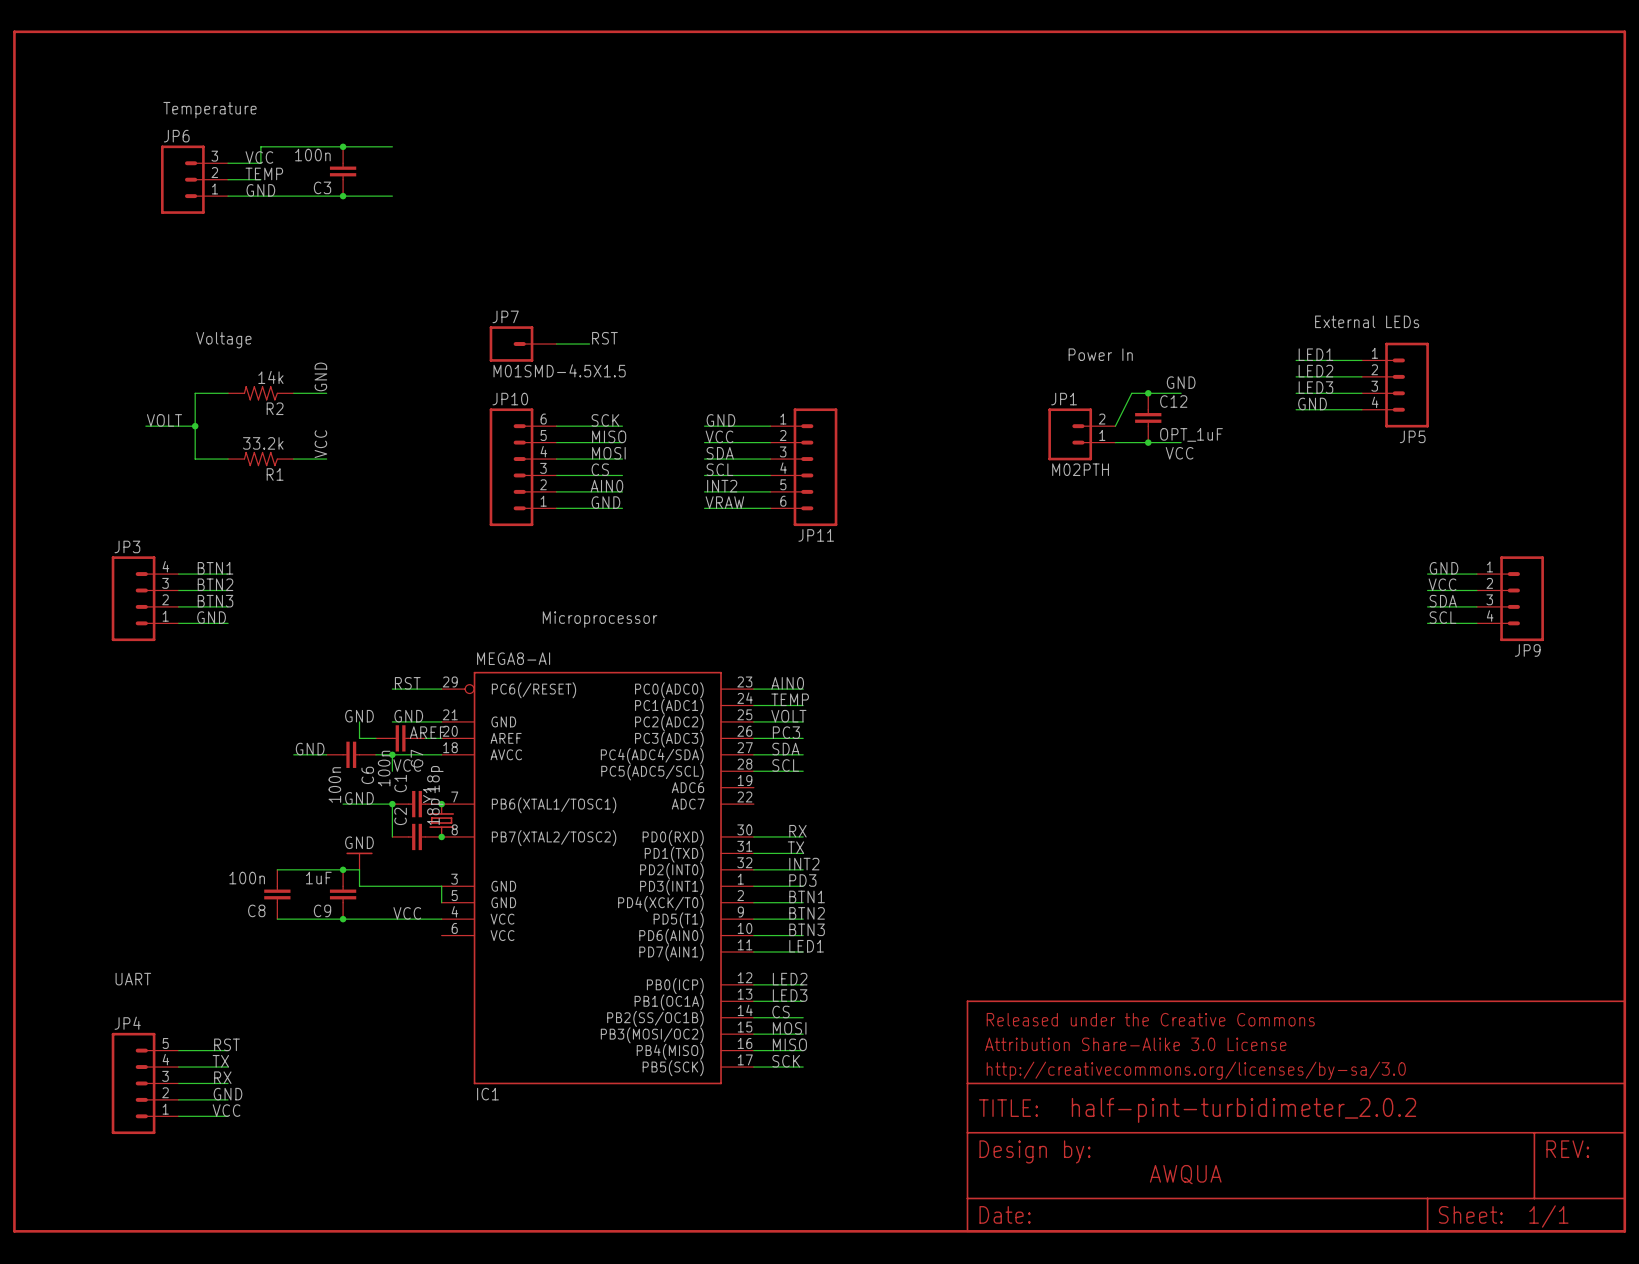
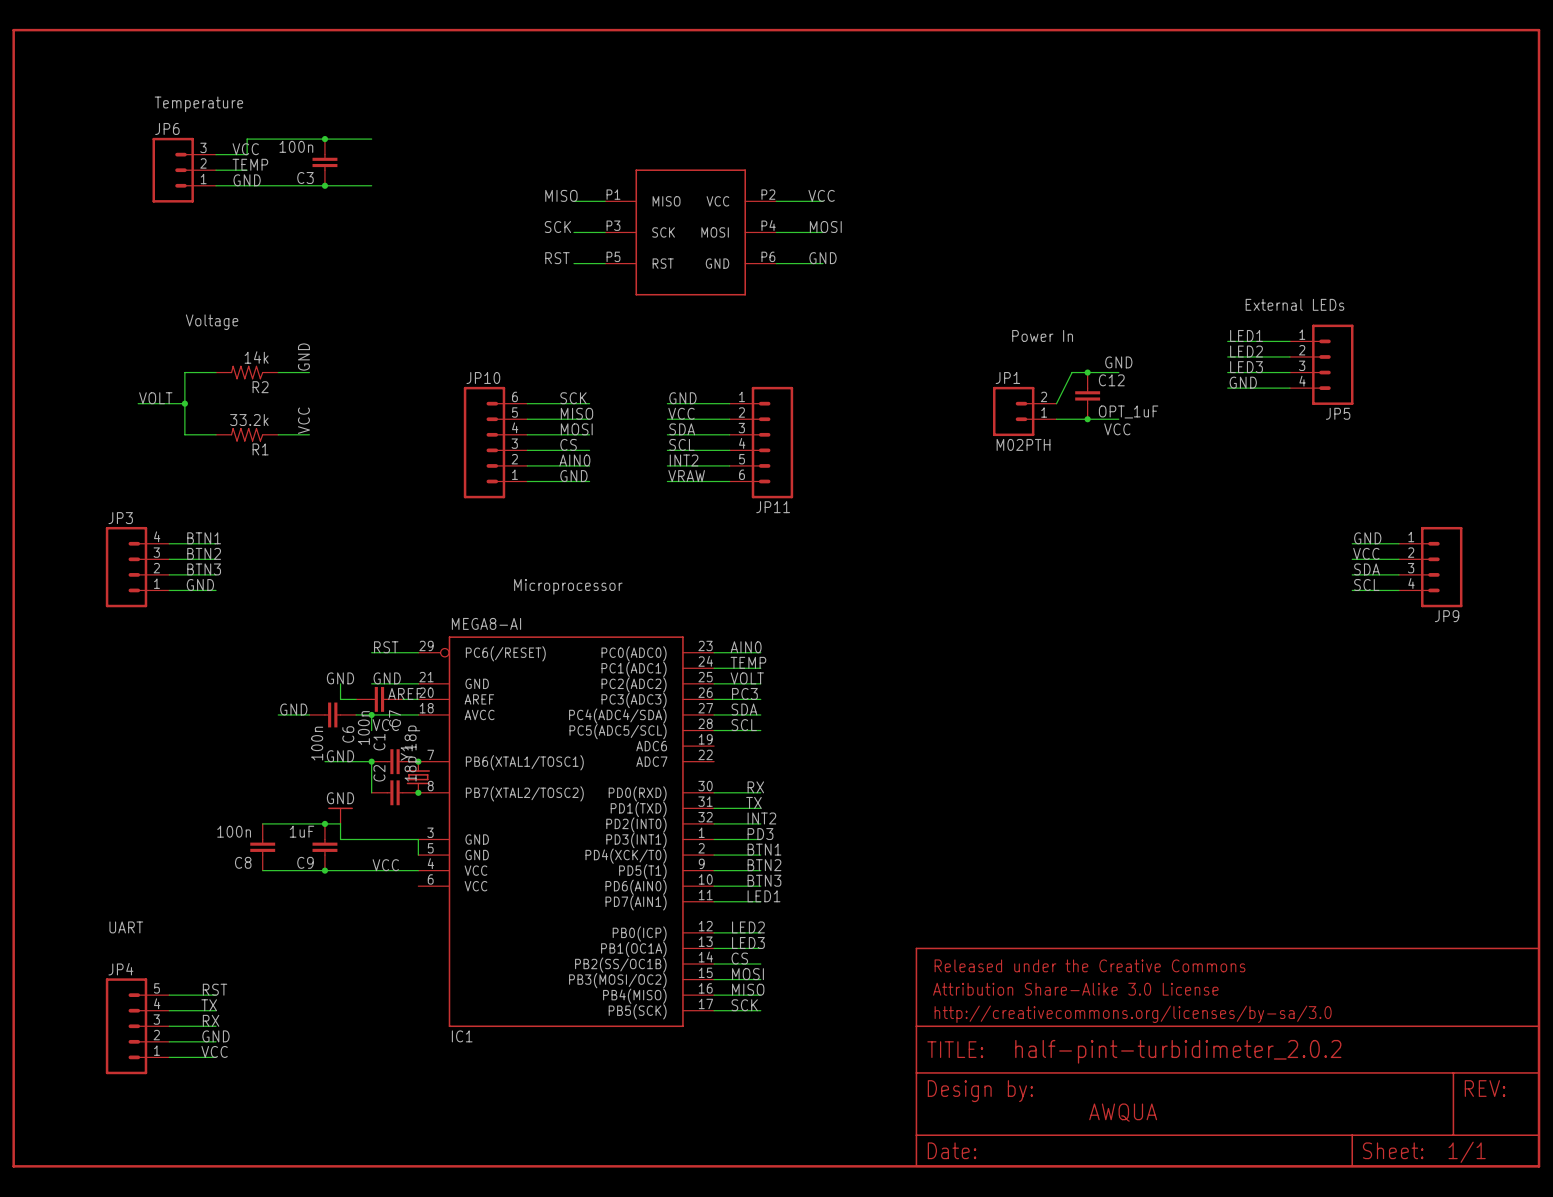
label: none -> MISO (561, 195)
label: none -> VCC (821, 195)
wire: none -> (574, 201) (605, 201)
wire: none -> (776, 201) (823, 201)
label: none -> SCK (557, 227)
label: none -> MOSI (825, 227)
wire: none -> (574, 232) (605, 232)
part: none -> (690, 232)
wire: none -> (776, 232) (823, 232)
label: none -> GND (822, 258)
wire: none -> (776, 263) (823, 263)
label position: RST (604, 338) -> RST (557, 258)
JP7: M01SMD-4.5X1.5 (523, 344) -> none
wire: (556, 344) (589, 344) -> (574, 263) (605, 263)

